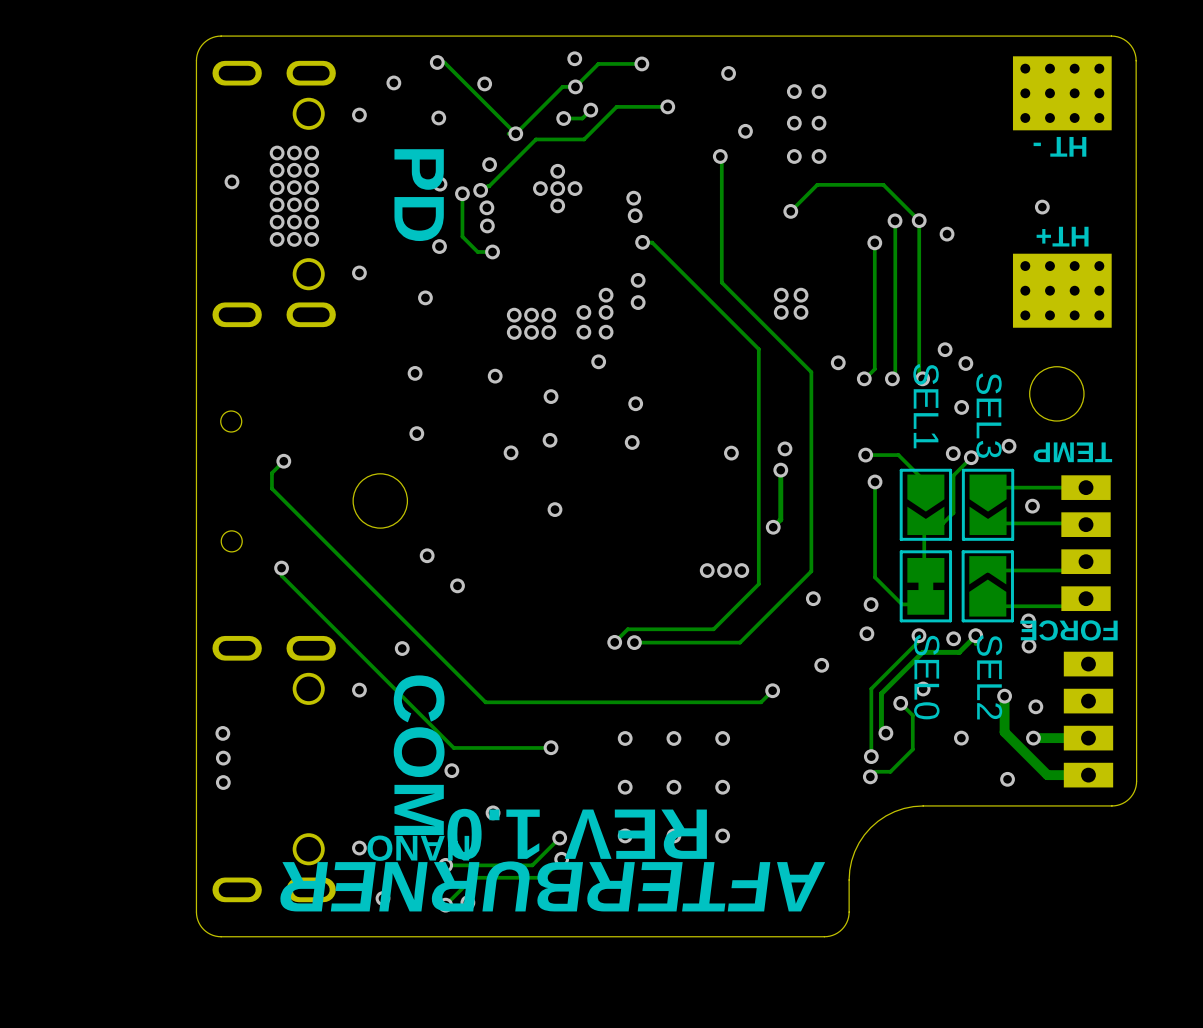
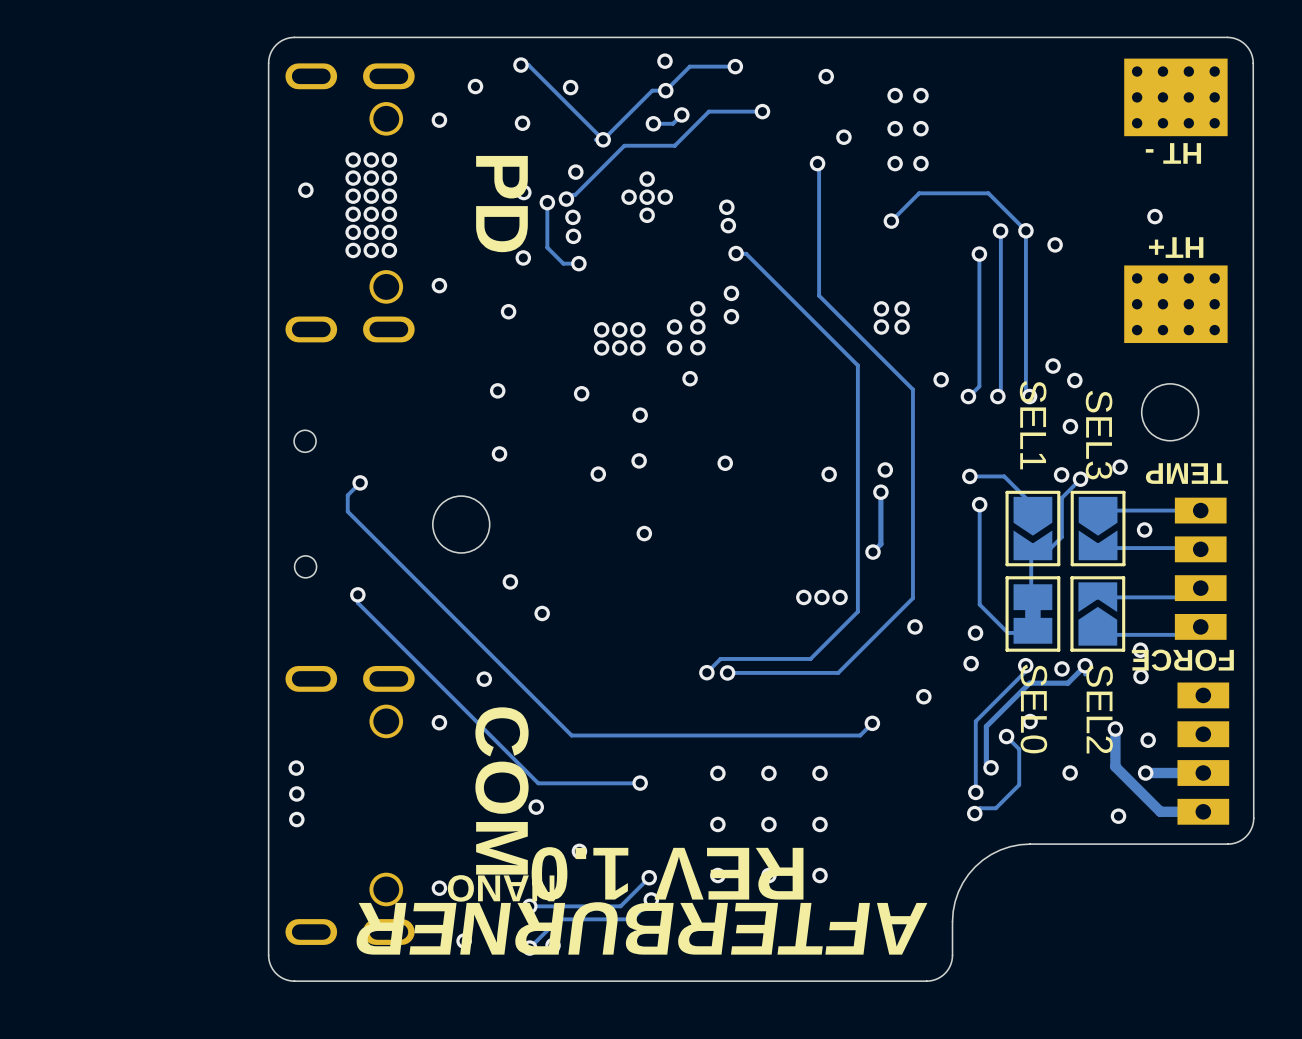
via: (635, 403) -> none

